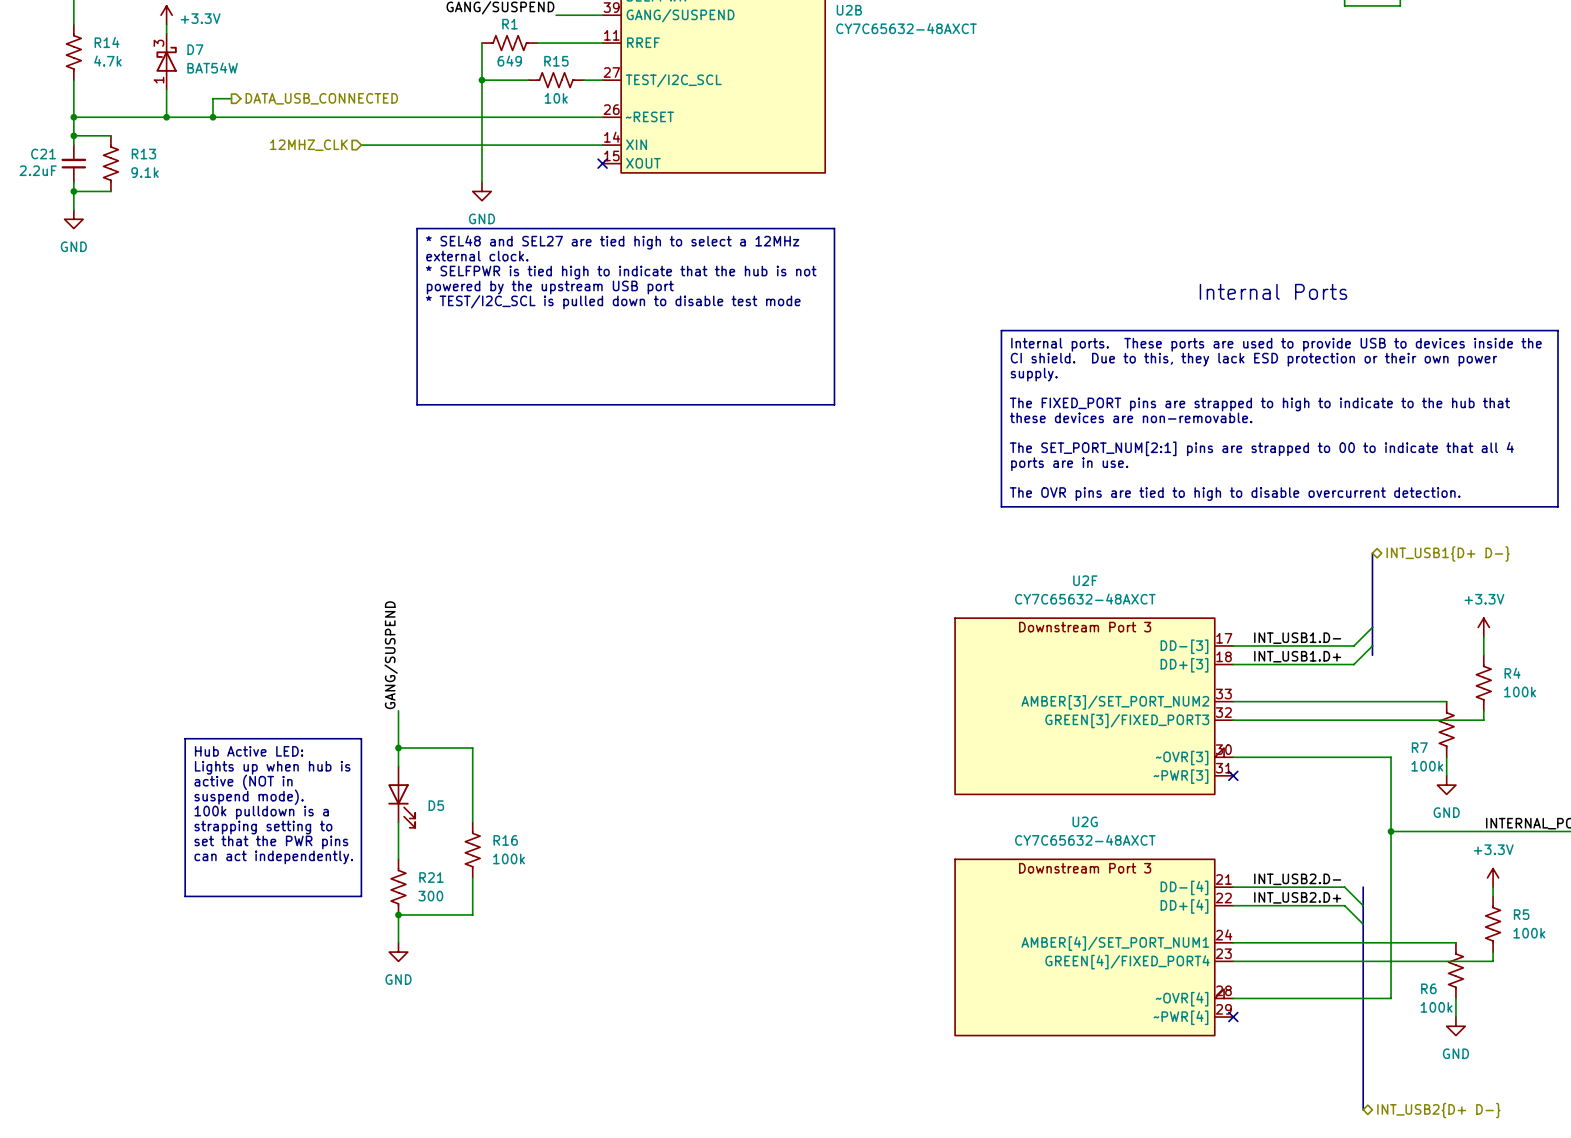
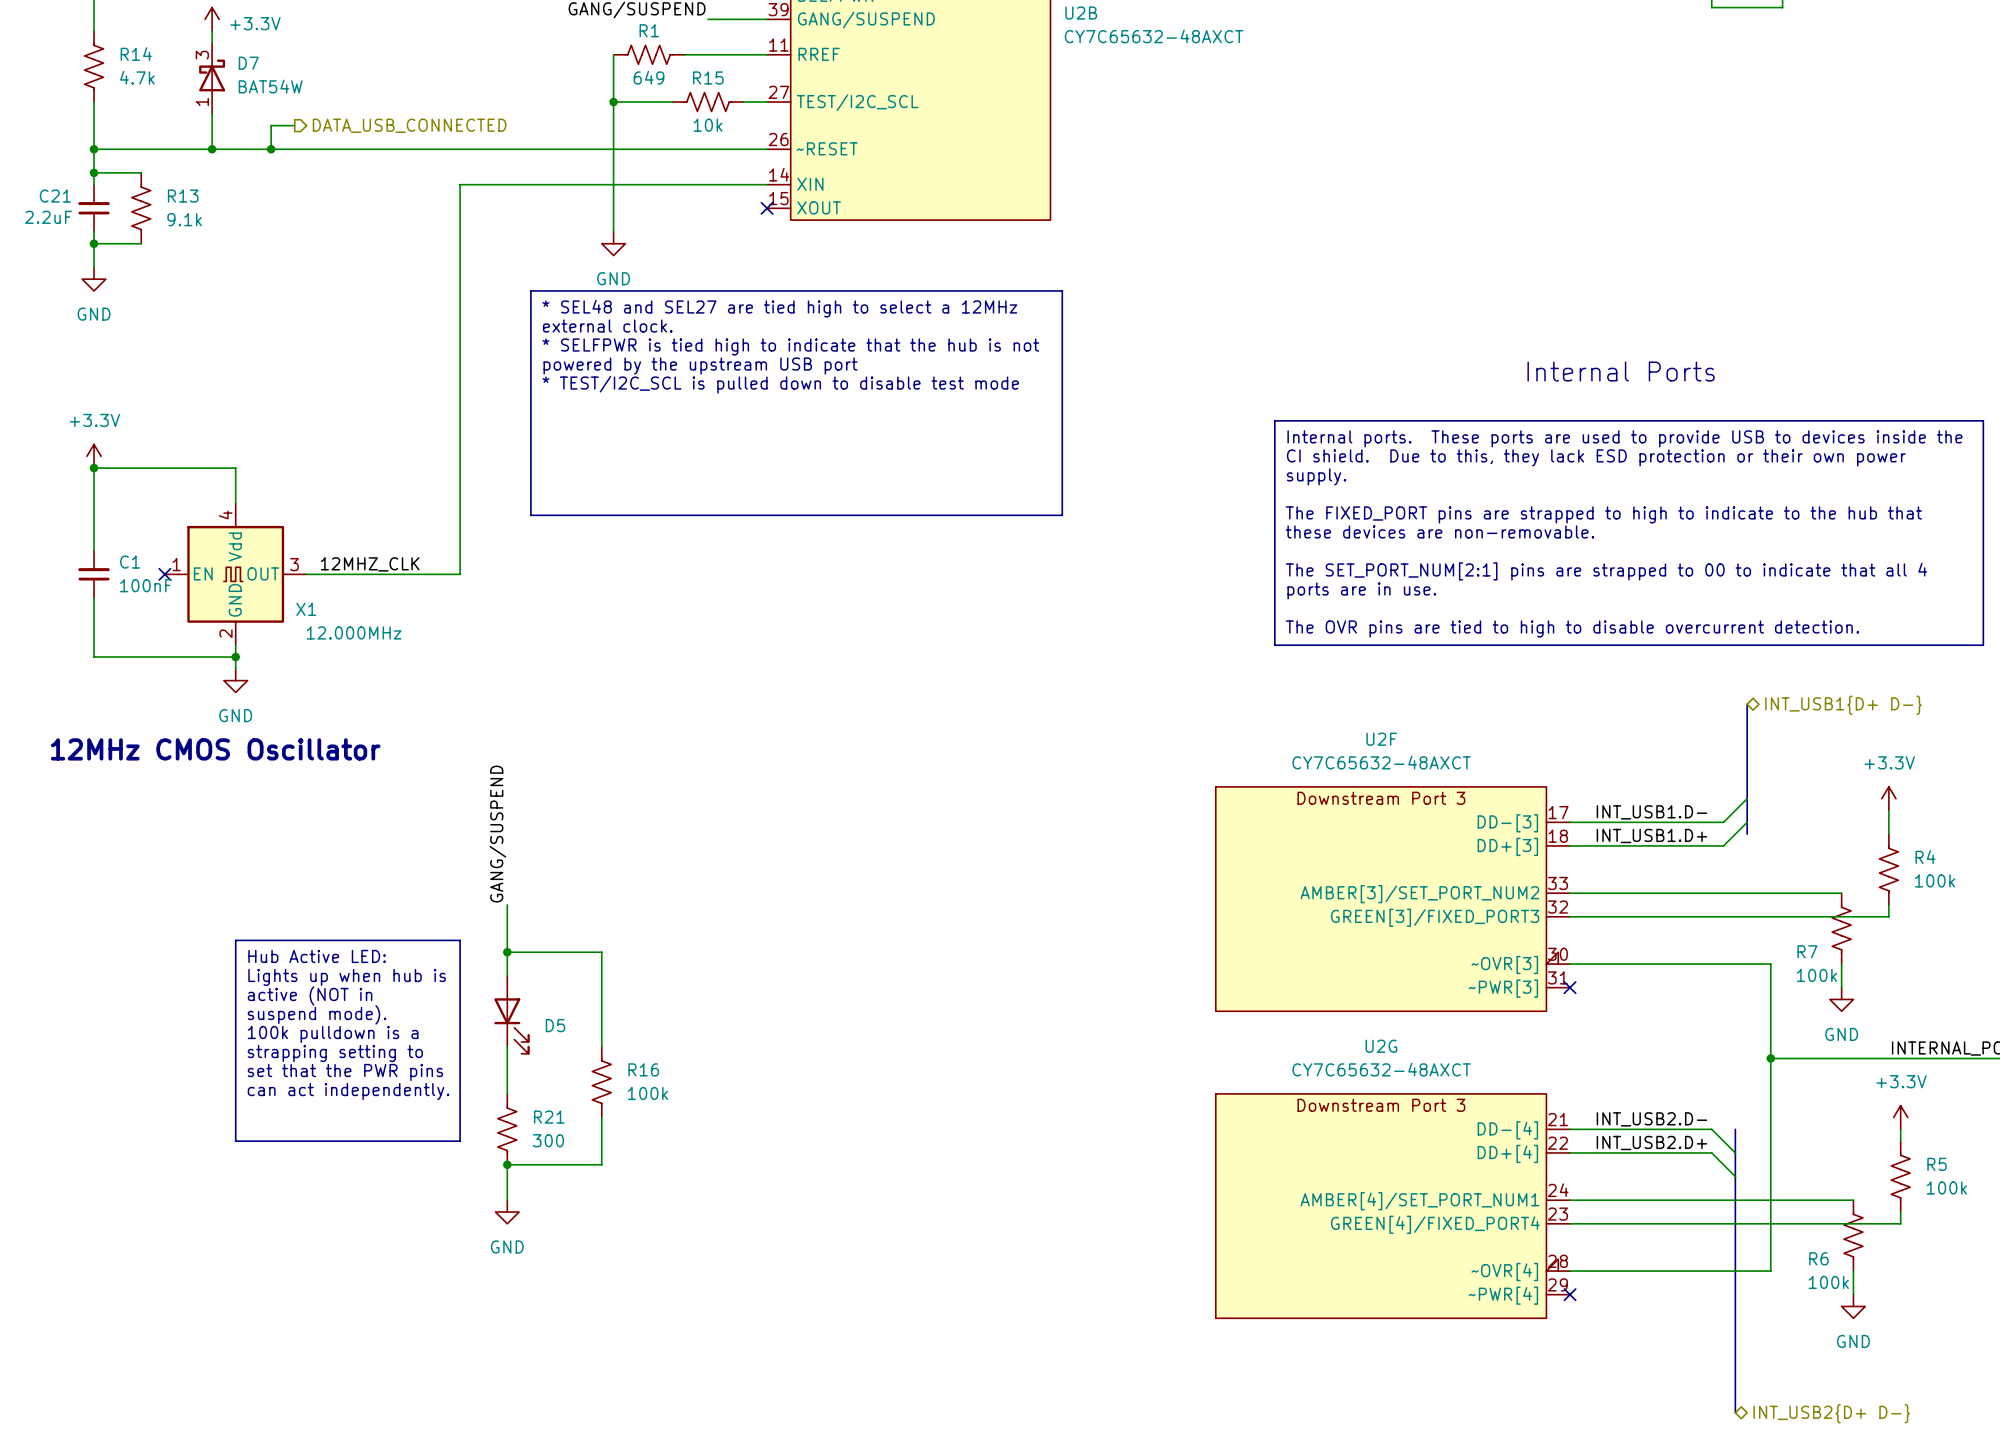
hierarchical label: 12MHZ_CLK (308, 145) -> none
wire: none -> (460, 184) (460, 574) (306, 574)
power symbol: none -> +3.3V (94, 456)
junction: none -> (94, 468)
wire: none -> (235, 503) (235, 468) (94, 468) (94, 550)
label: none -> 12MHZ_CLK (370, 564)
C1: none -> 100nF (94, 574)
no-connect mark: none -> (164, 574)
X1: none -> 12.000MHz (235, 574)
wire: none -> (94, 597) (94, 657) (235, 657)
wire: none -> (235, 645) (235, 668)
junction: none -> (235, 657)
power symbol: none -> GND (235, 680)
text: none -> 12MHz CMOS Oscillator (215, 749)

